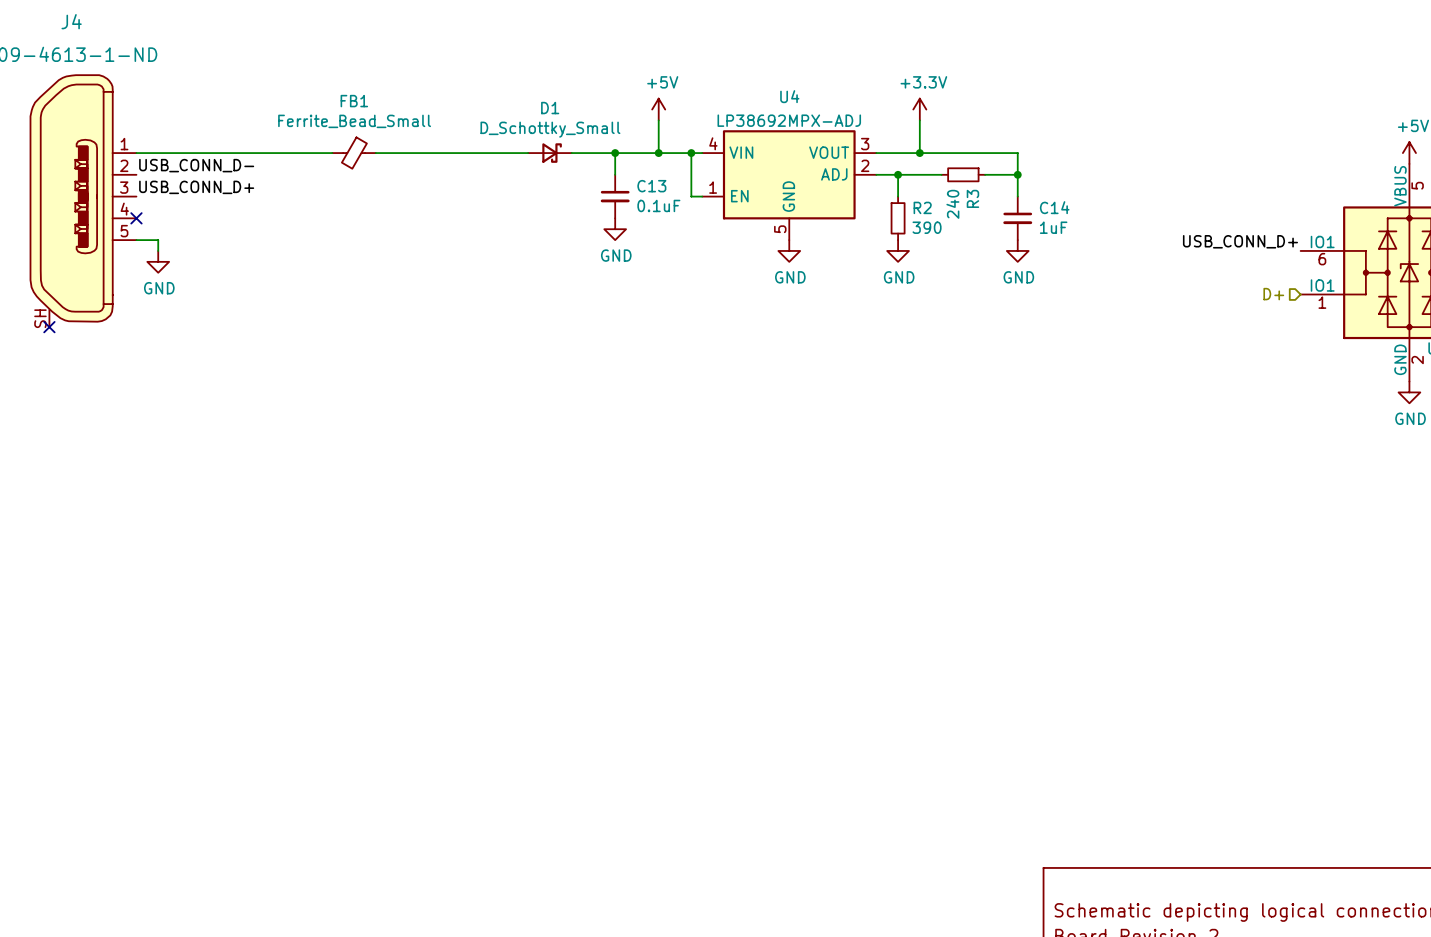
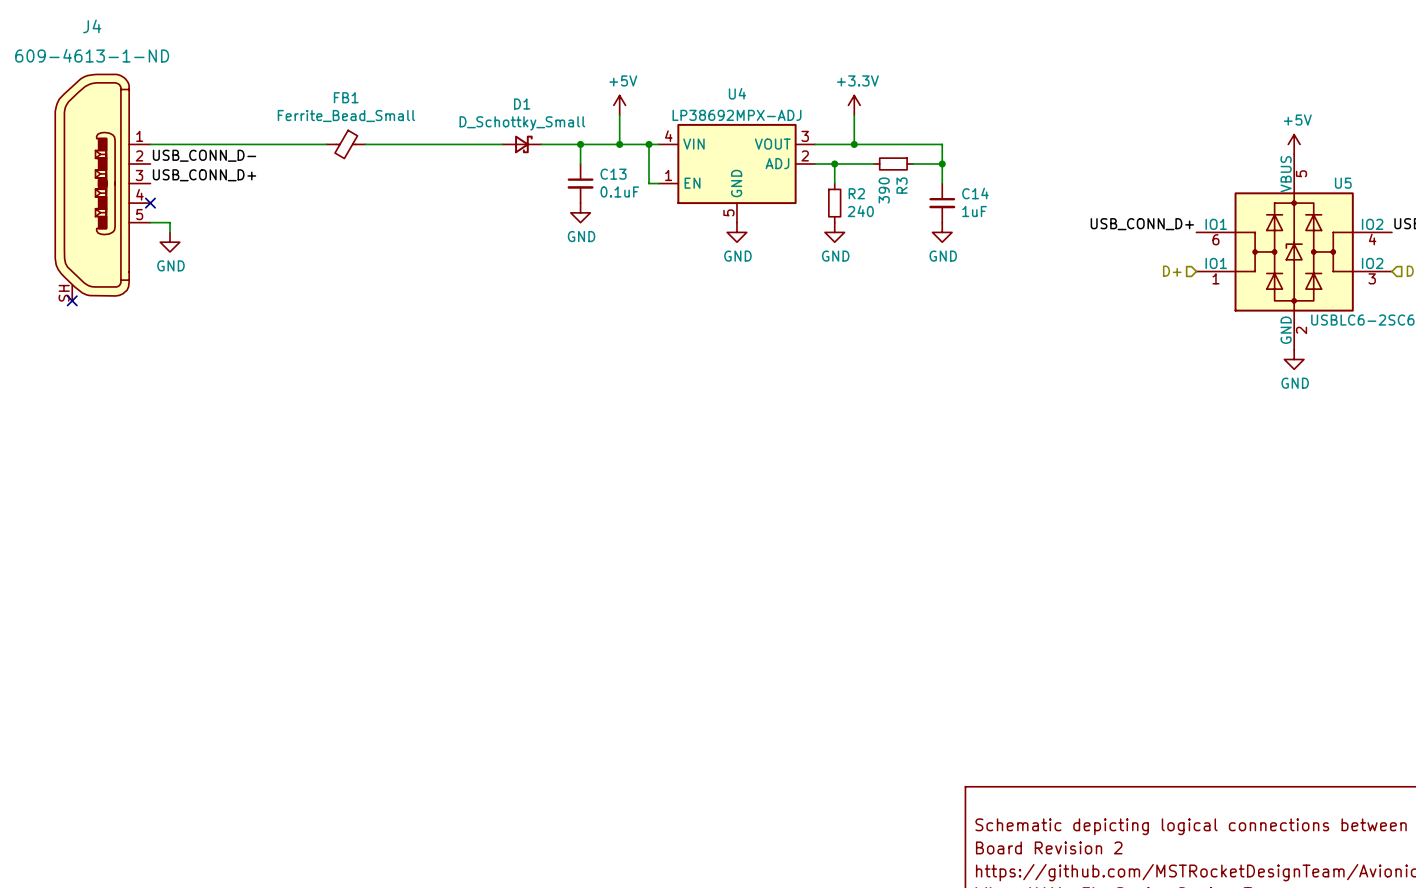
R3 value: 240 (952, 204) -> 390 (884, 190)
R2 value: 390 (927, 227) -> 240 (860, 211)

